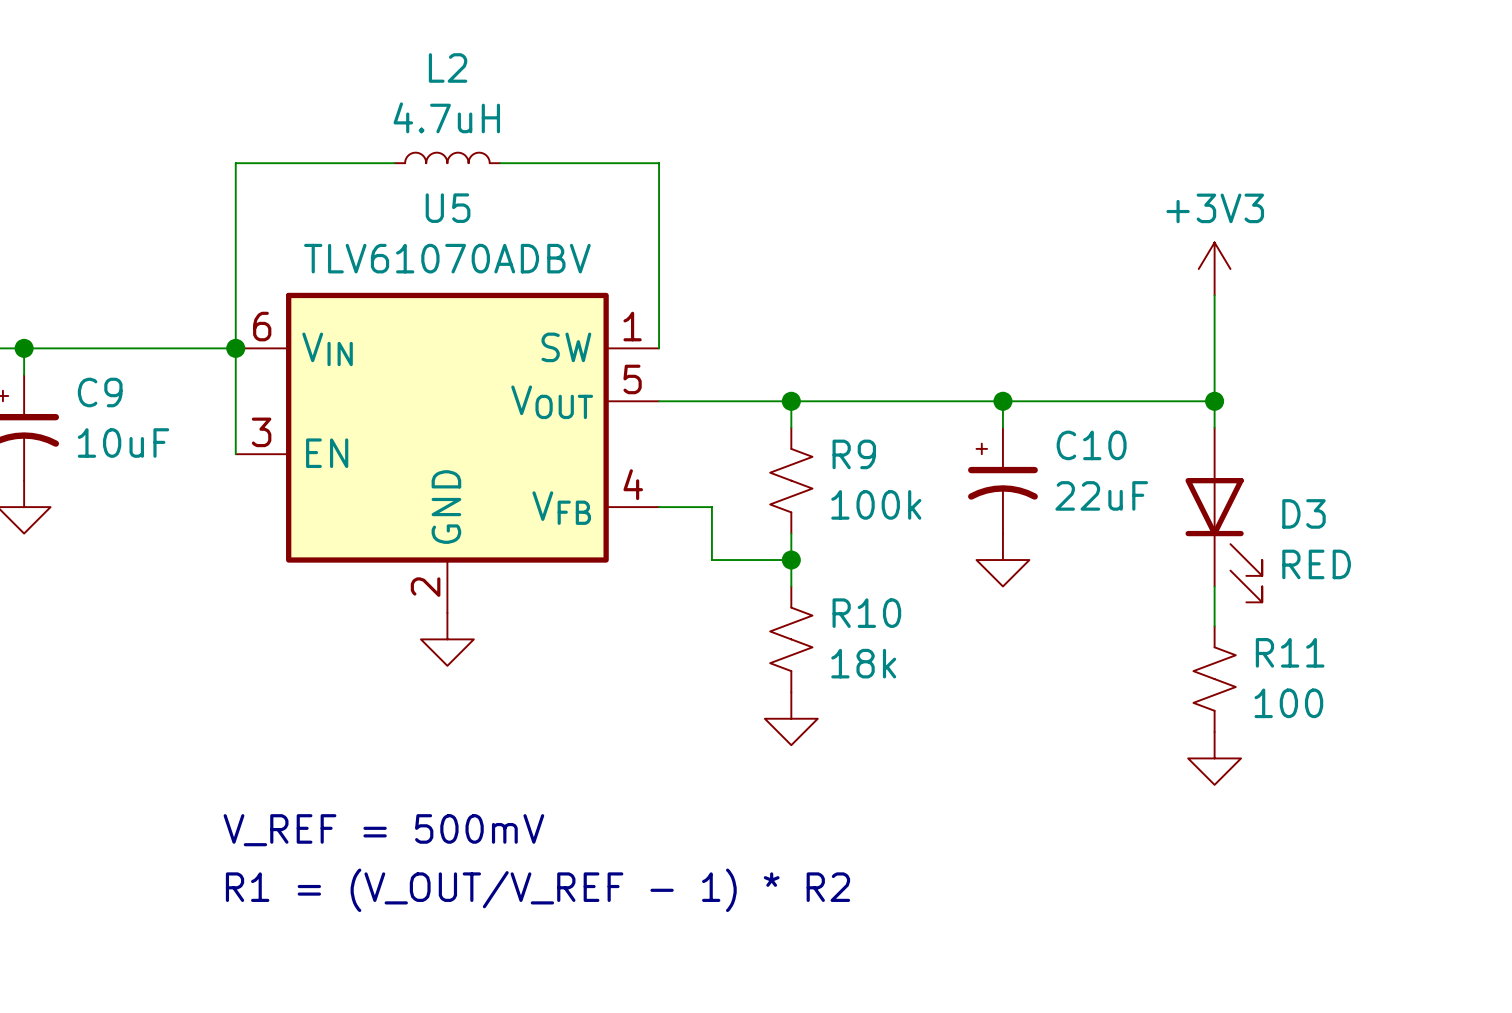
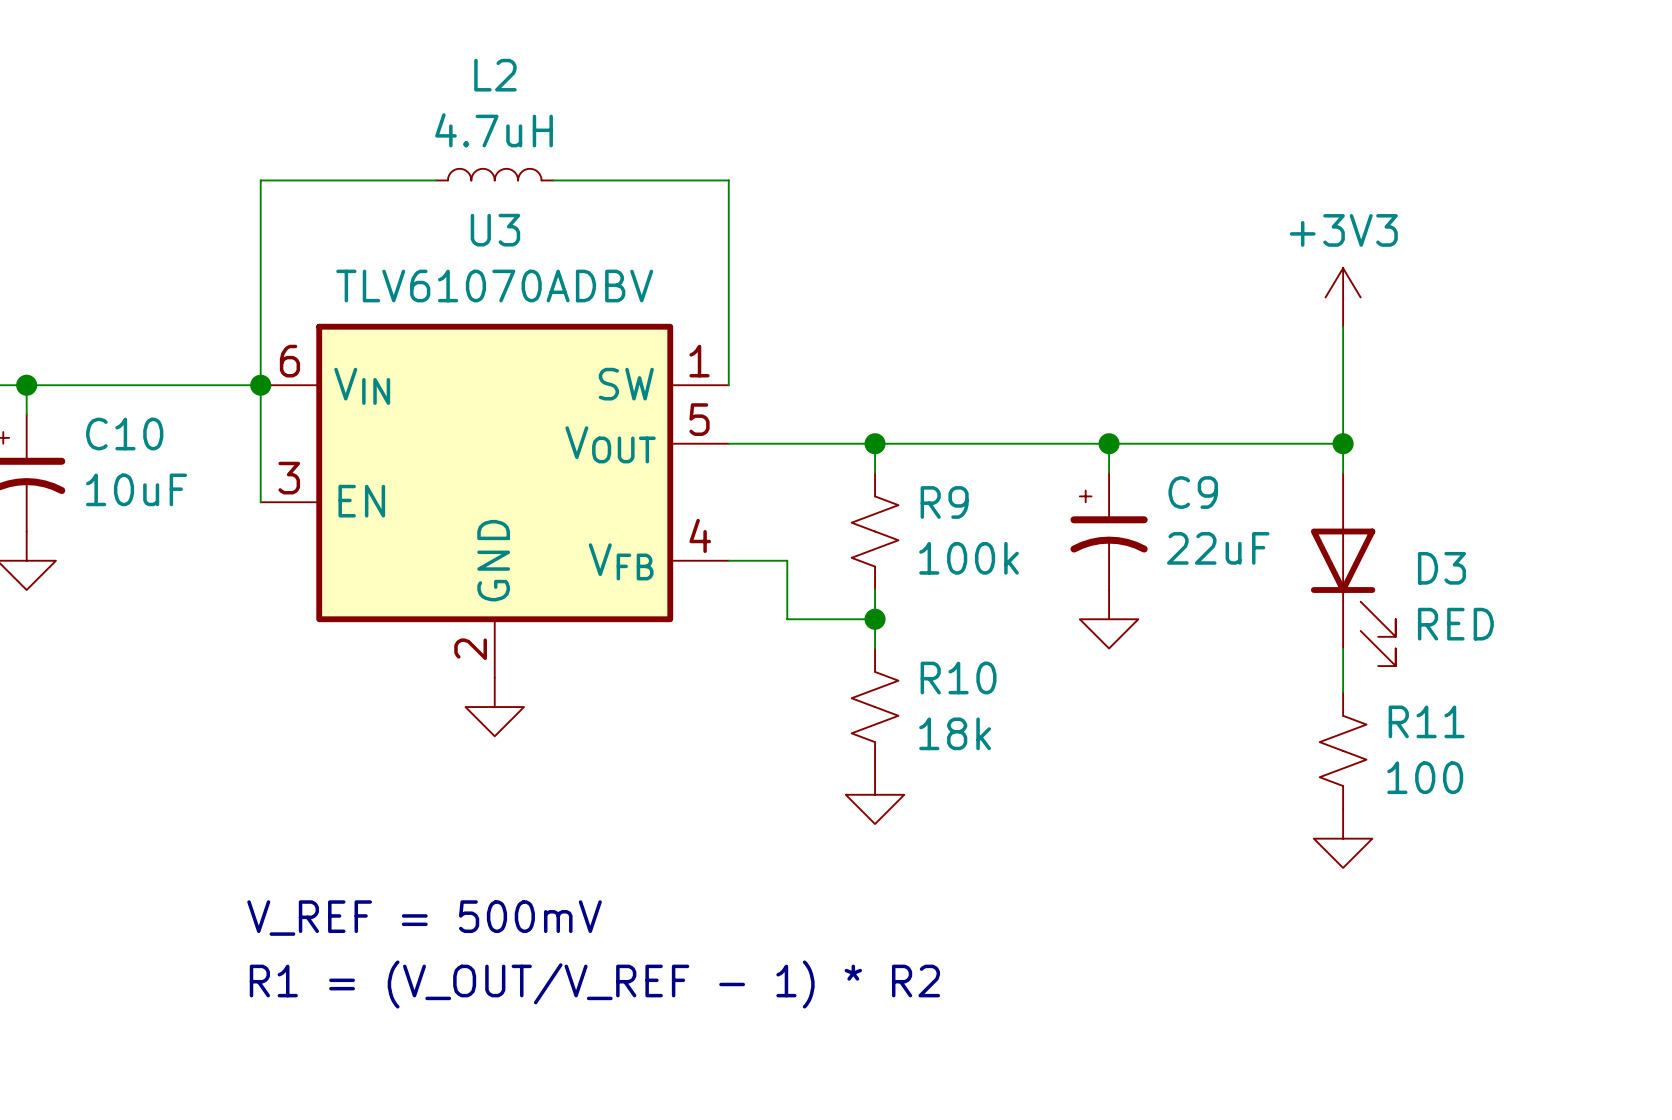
U5 name: U5 (448, 208) -> U3 (495, 230)
C9 name: C9 (100, 392) -> C10 (124, 434)
C10 name: C10 (1091, 445) -> C9 (1193, 492)

